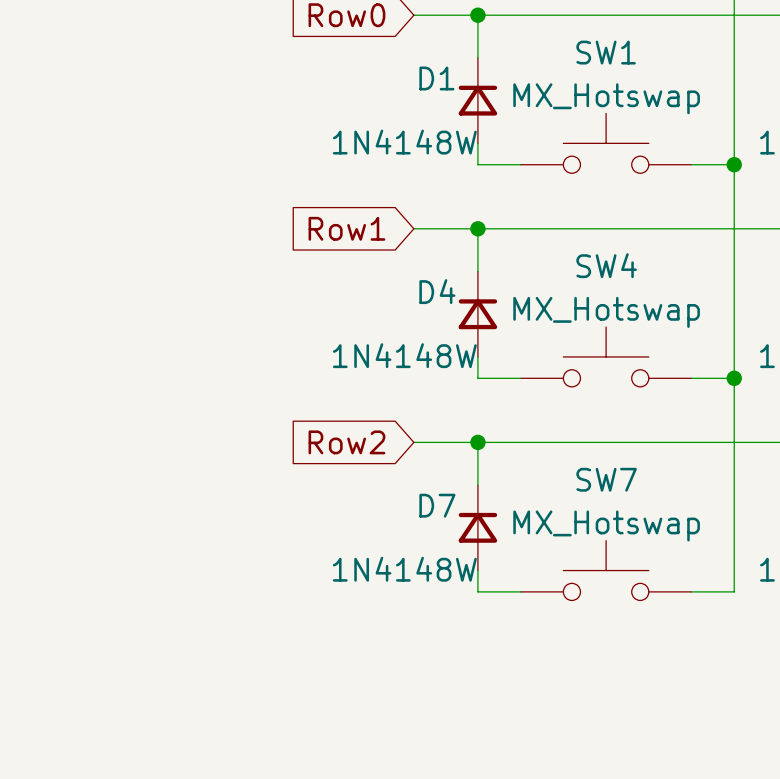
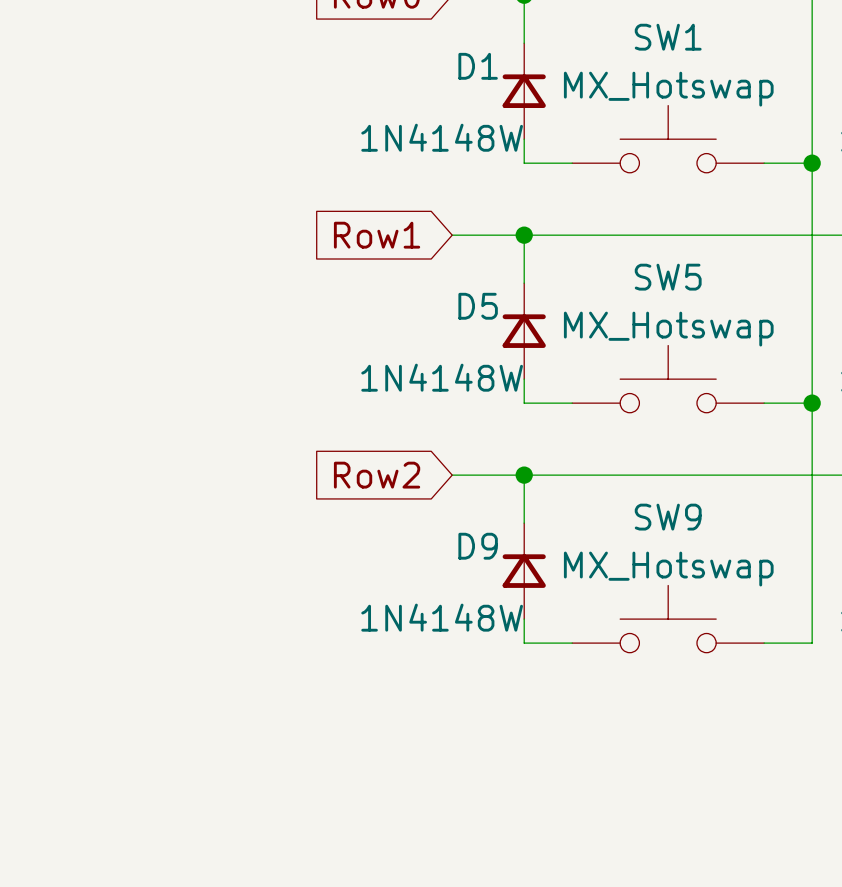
SW4 name: SW4 (606, 265) -> SW5 (668, 277)
D4 name: D4 (437, 291) -> D5 (478, 306)
SW7 name: SW7 (606, 479) -> SW9 (668, 517)
D7 name: D7 (437, 505) -> D9 (478, 546)

